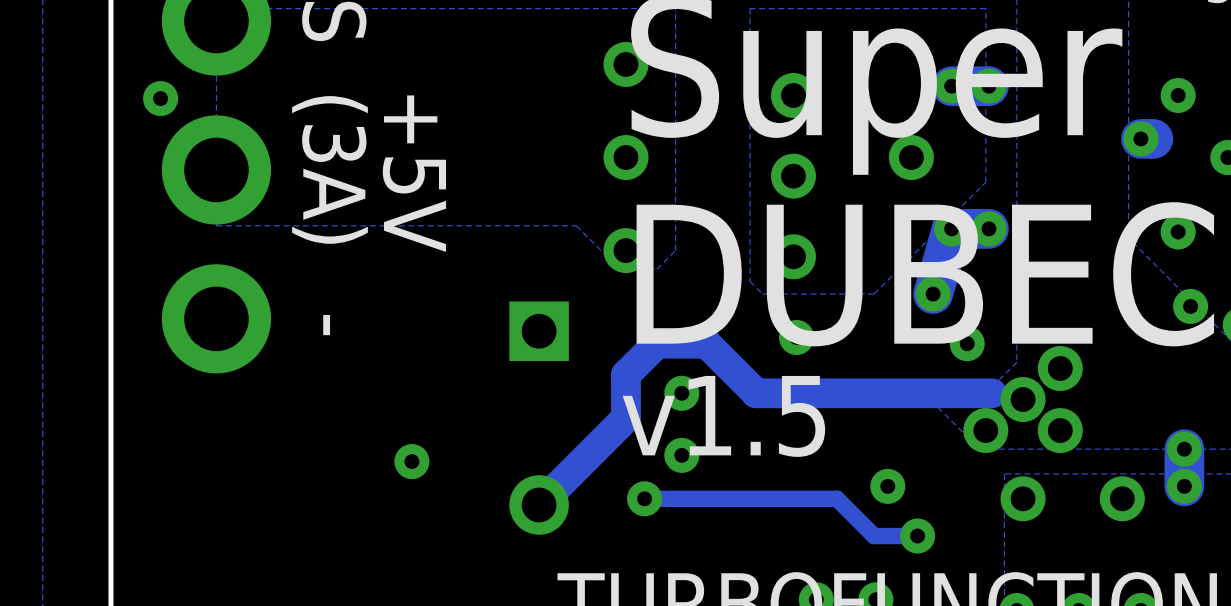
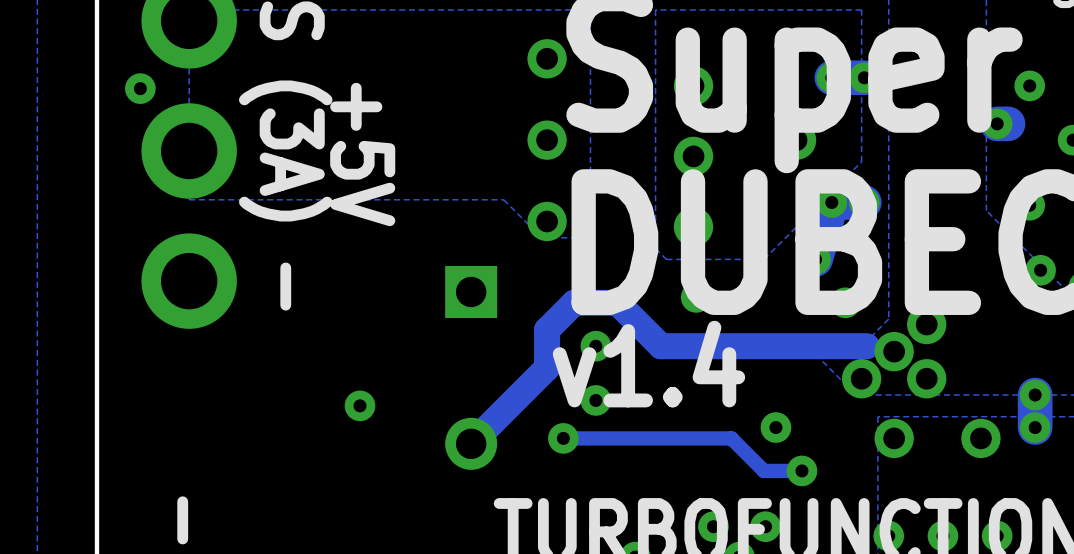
text: v1.5 (723, 416) -> v1.4 (648, 364)

